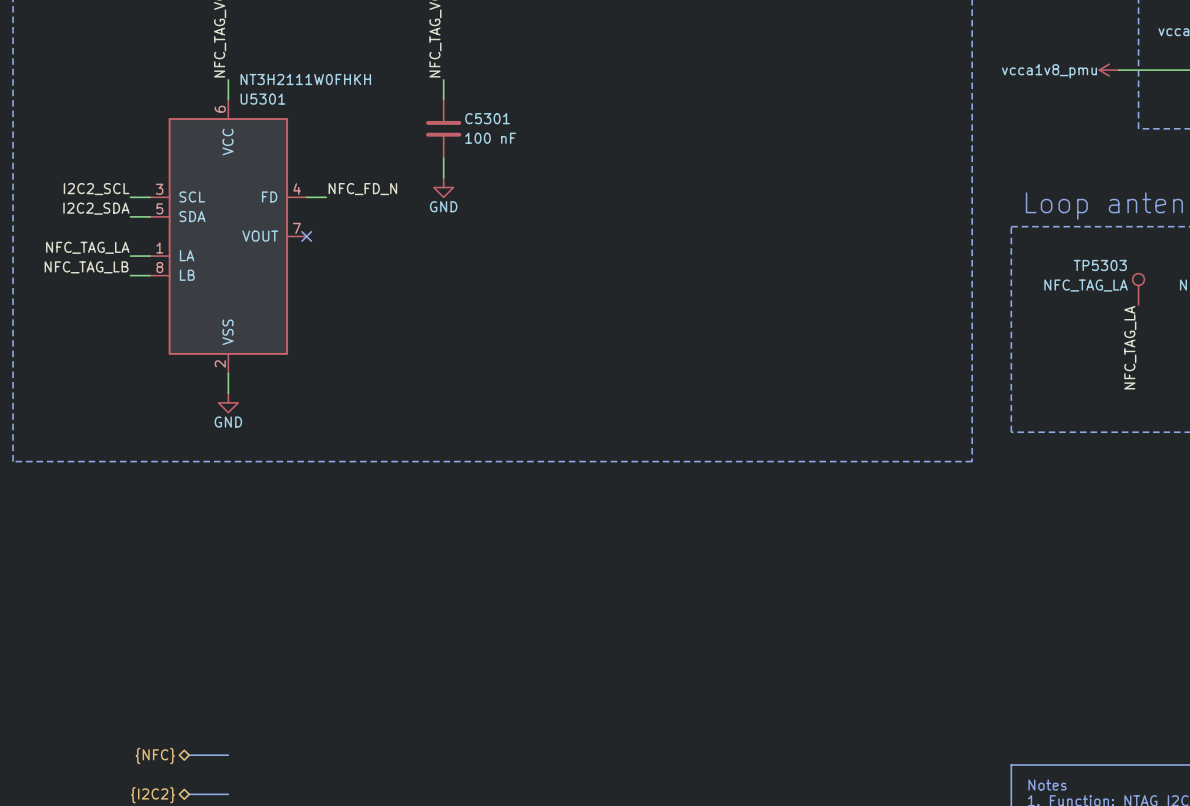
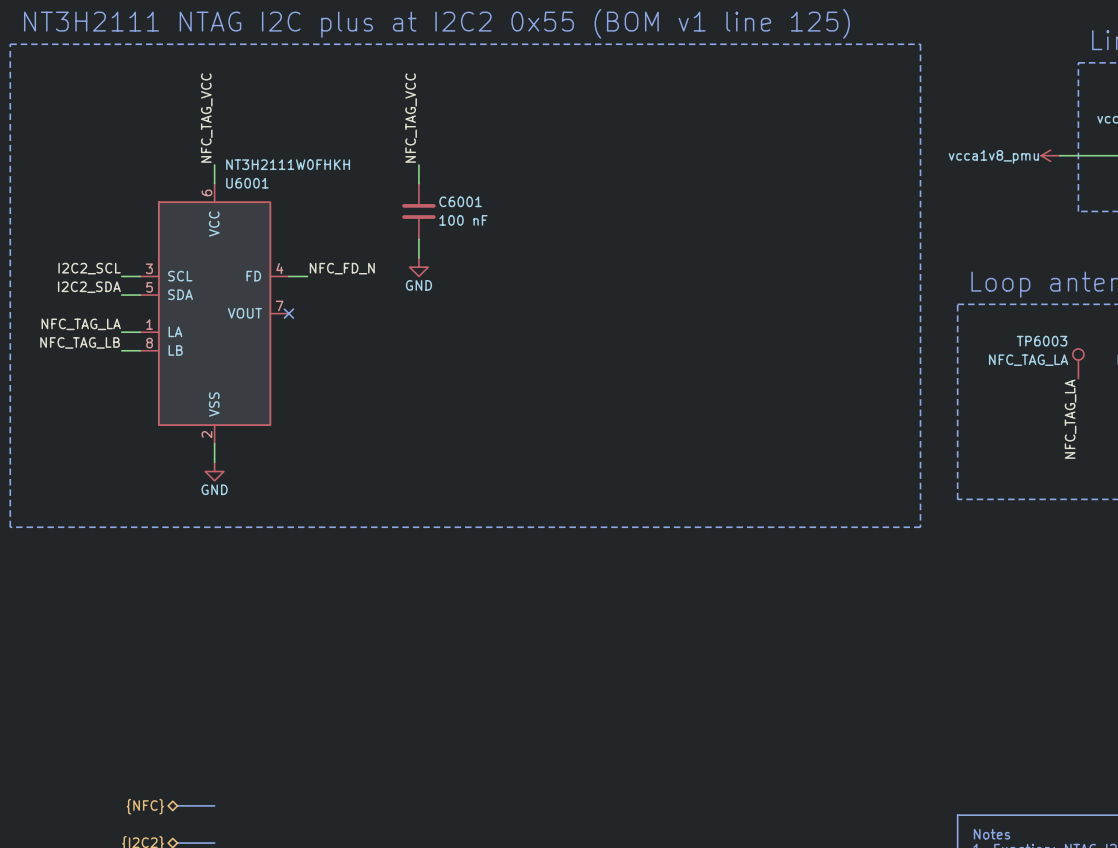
U5301 name: U5301 (262, 99) -> U6001 (247, 183)
C5301 name: C5301 (487, 118) -> C6001 (460, 201)
TP5303 name: TP5303 (1100, 265) -> TP6003 (1042, 341)

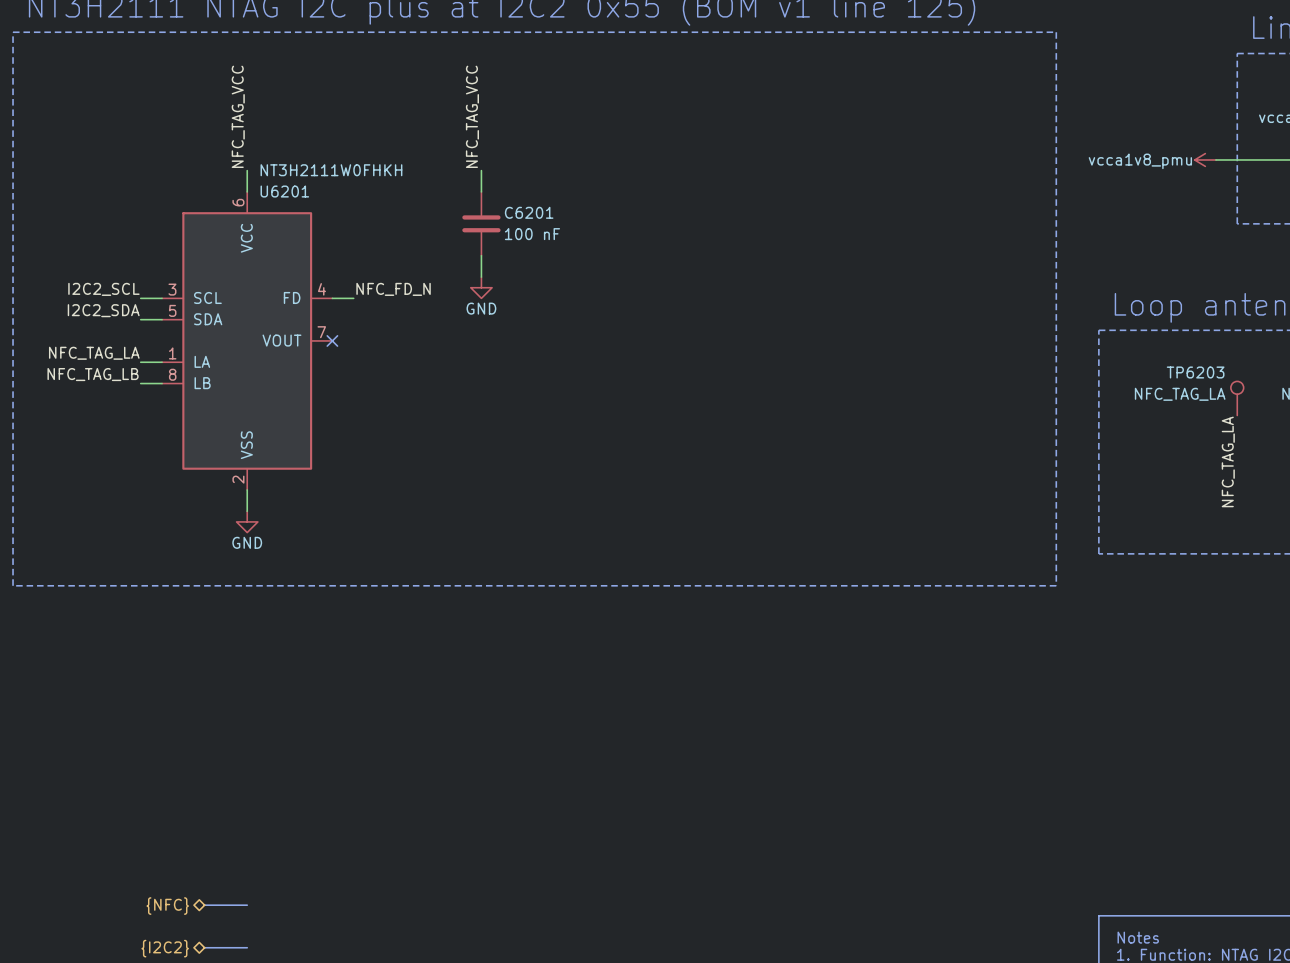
U6001 name: U6001 (247, 183) -> U6201 (284, 191)
C6001 name: C6001 (460, 201) -> C6201 (529, 212)
TP6003 name: TP6003 (1042, 341) -> TP6203 (1195, 372)

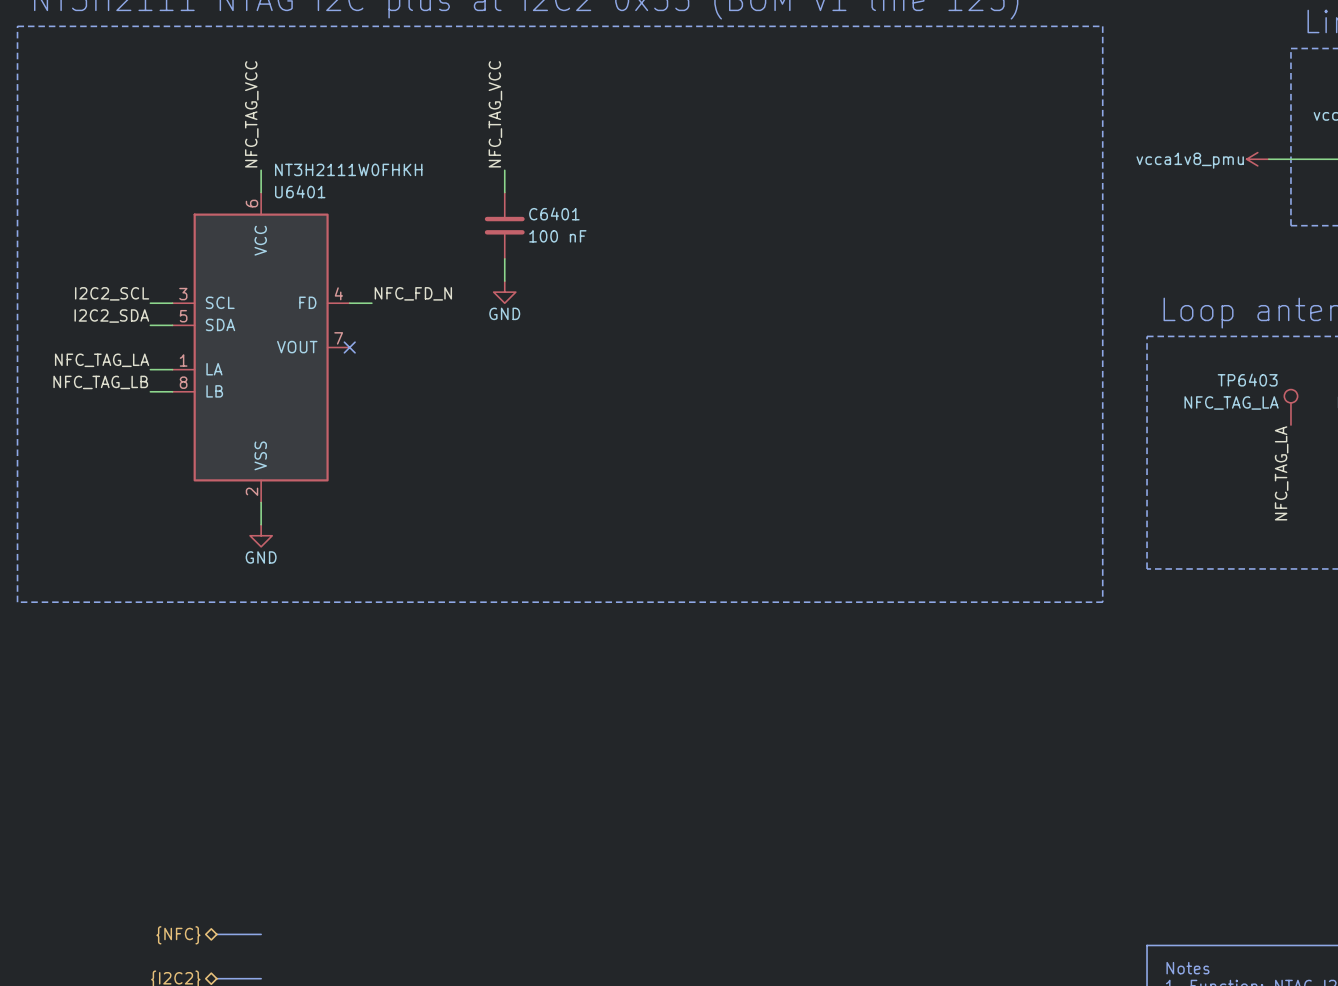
U6201 name: U6201 (284, 191) -> U6401 (300, 191)
C6201 name: C6201 (529, 212) -> C6401 (554, 213)
TP6203 name: TP6203 (1195, 372) -> TP6403 (1247, 380)

